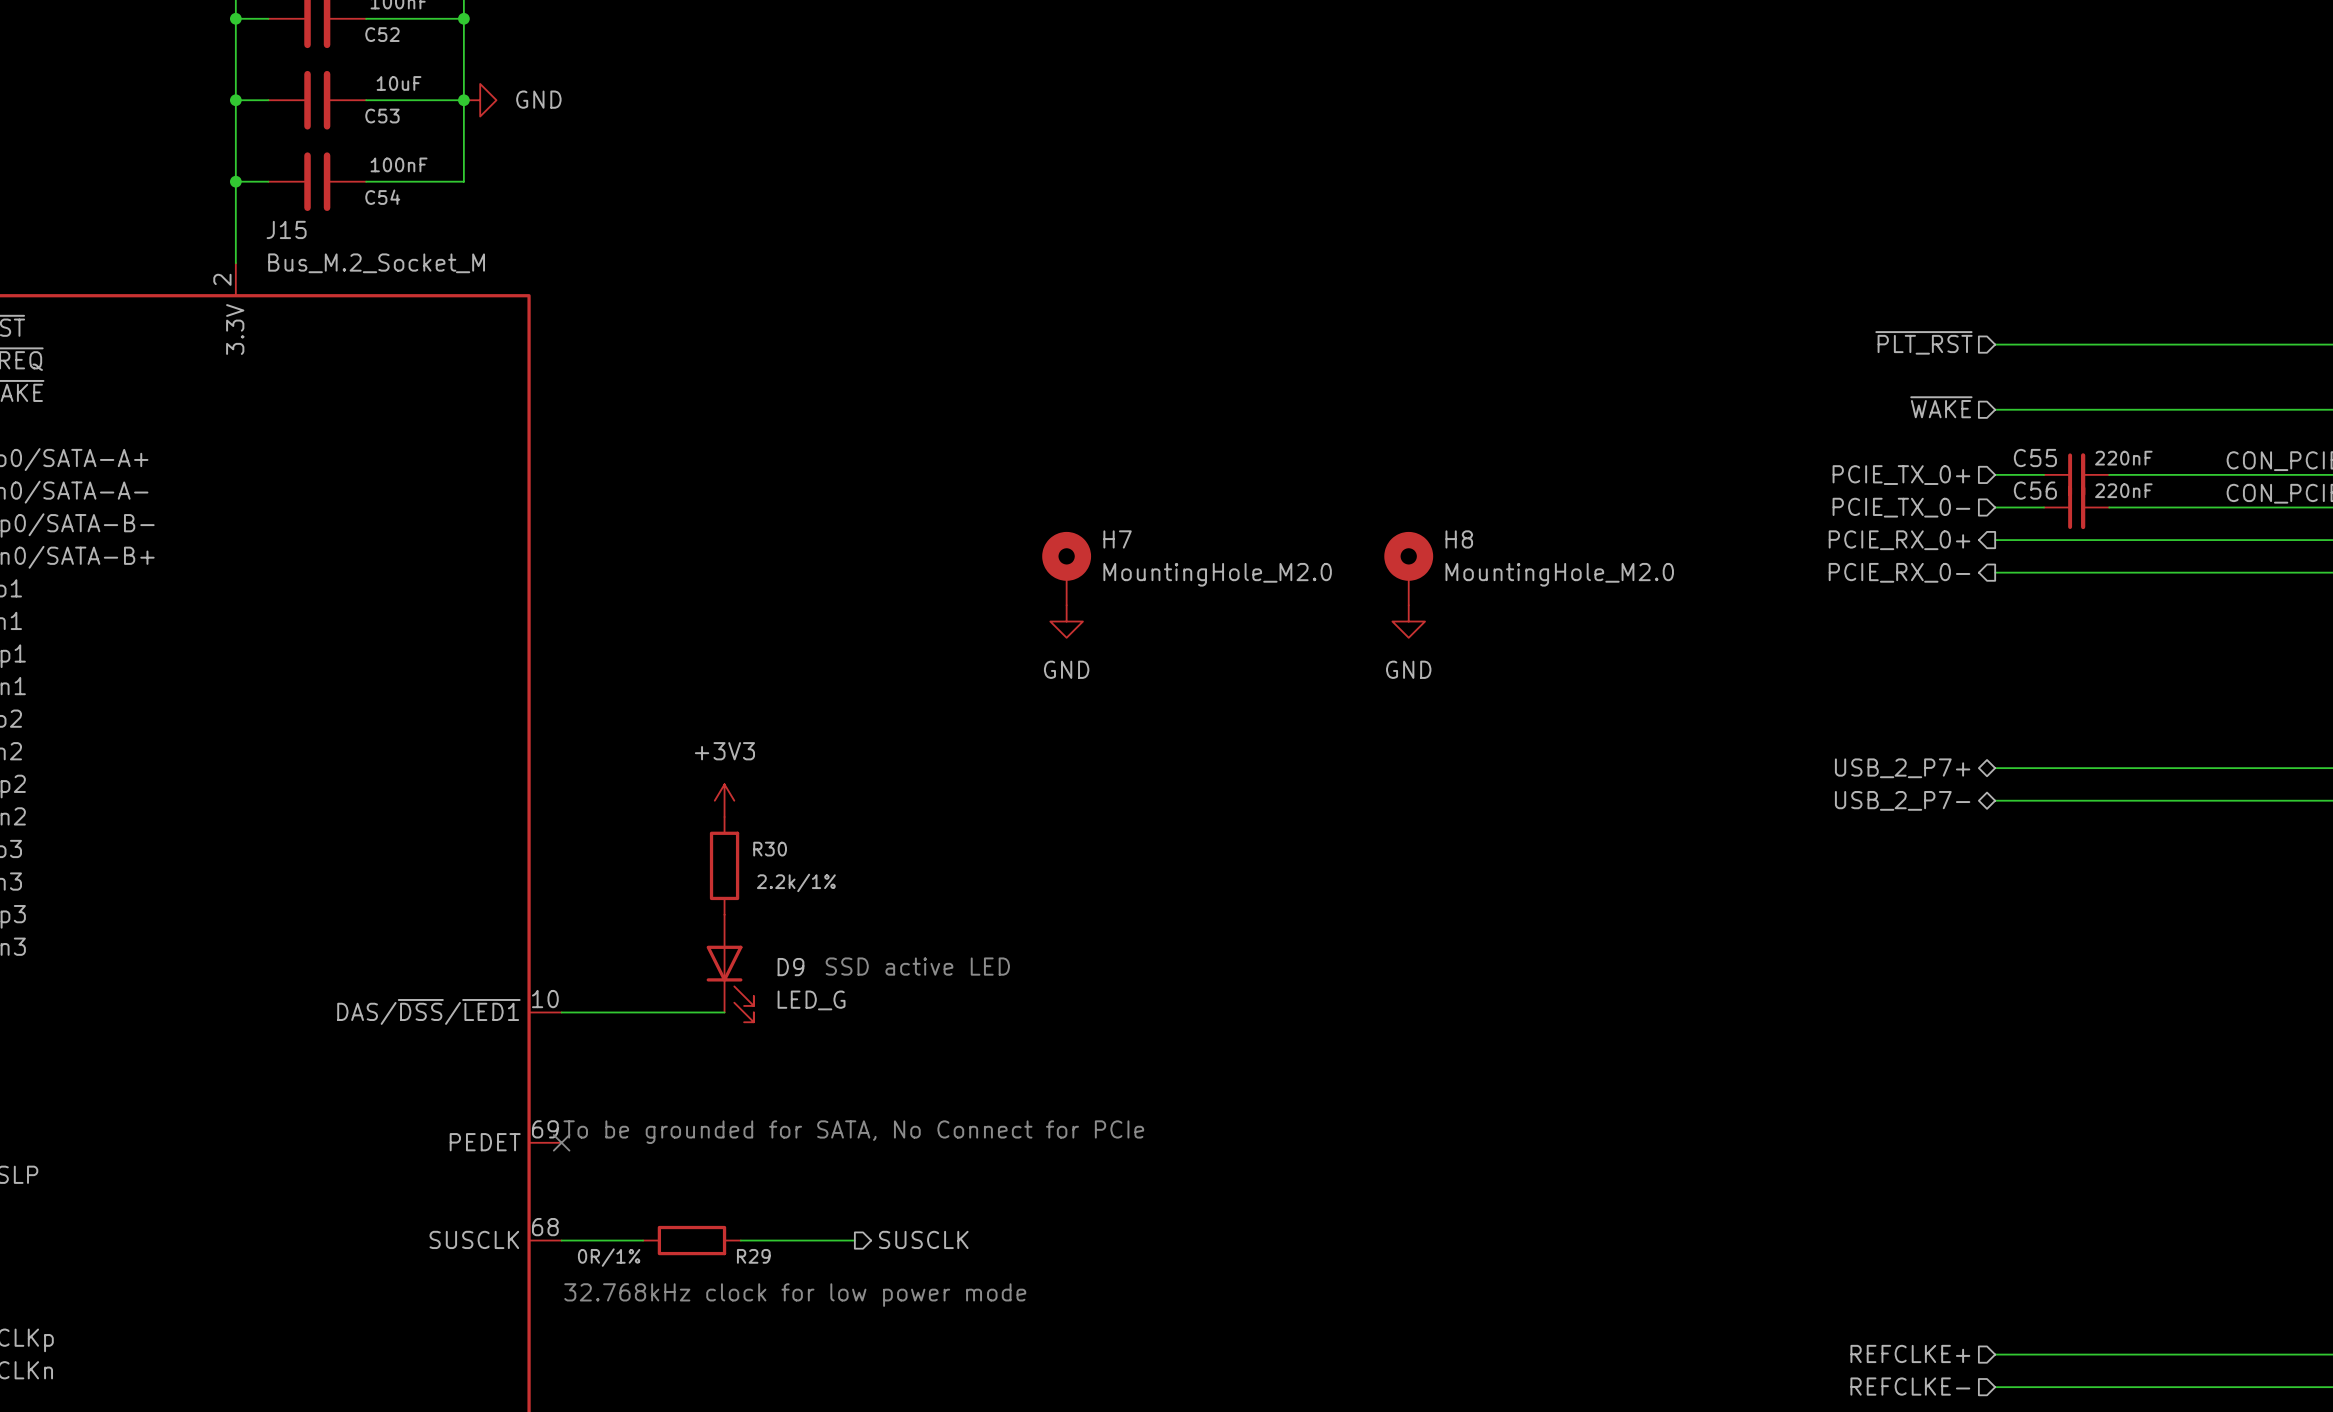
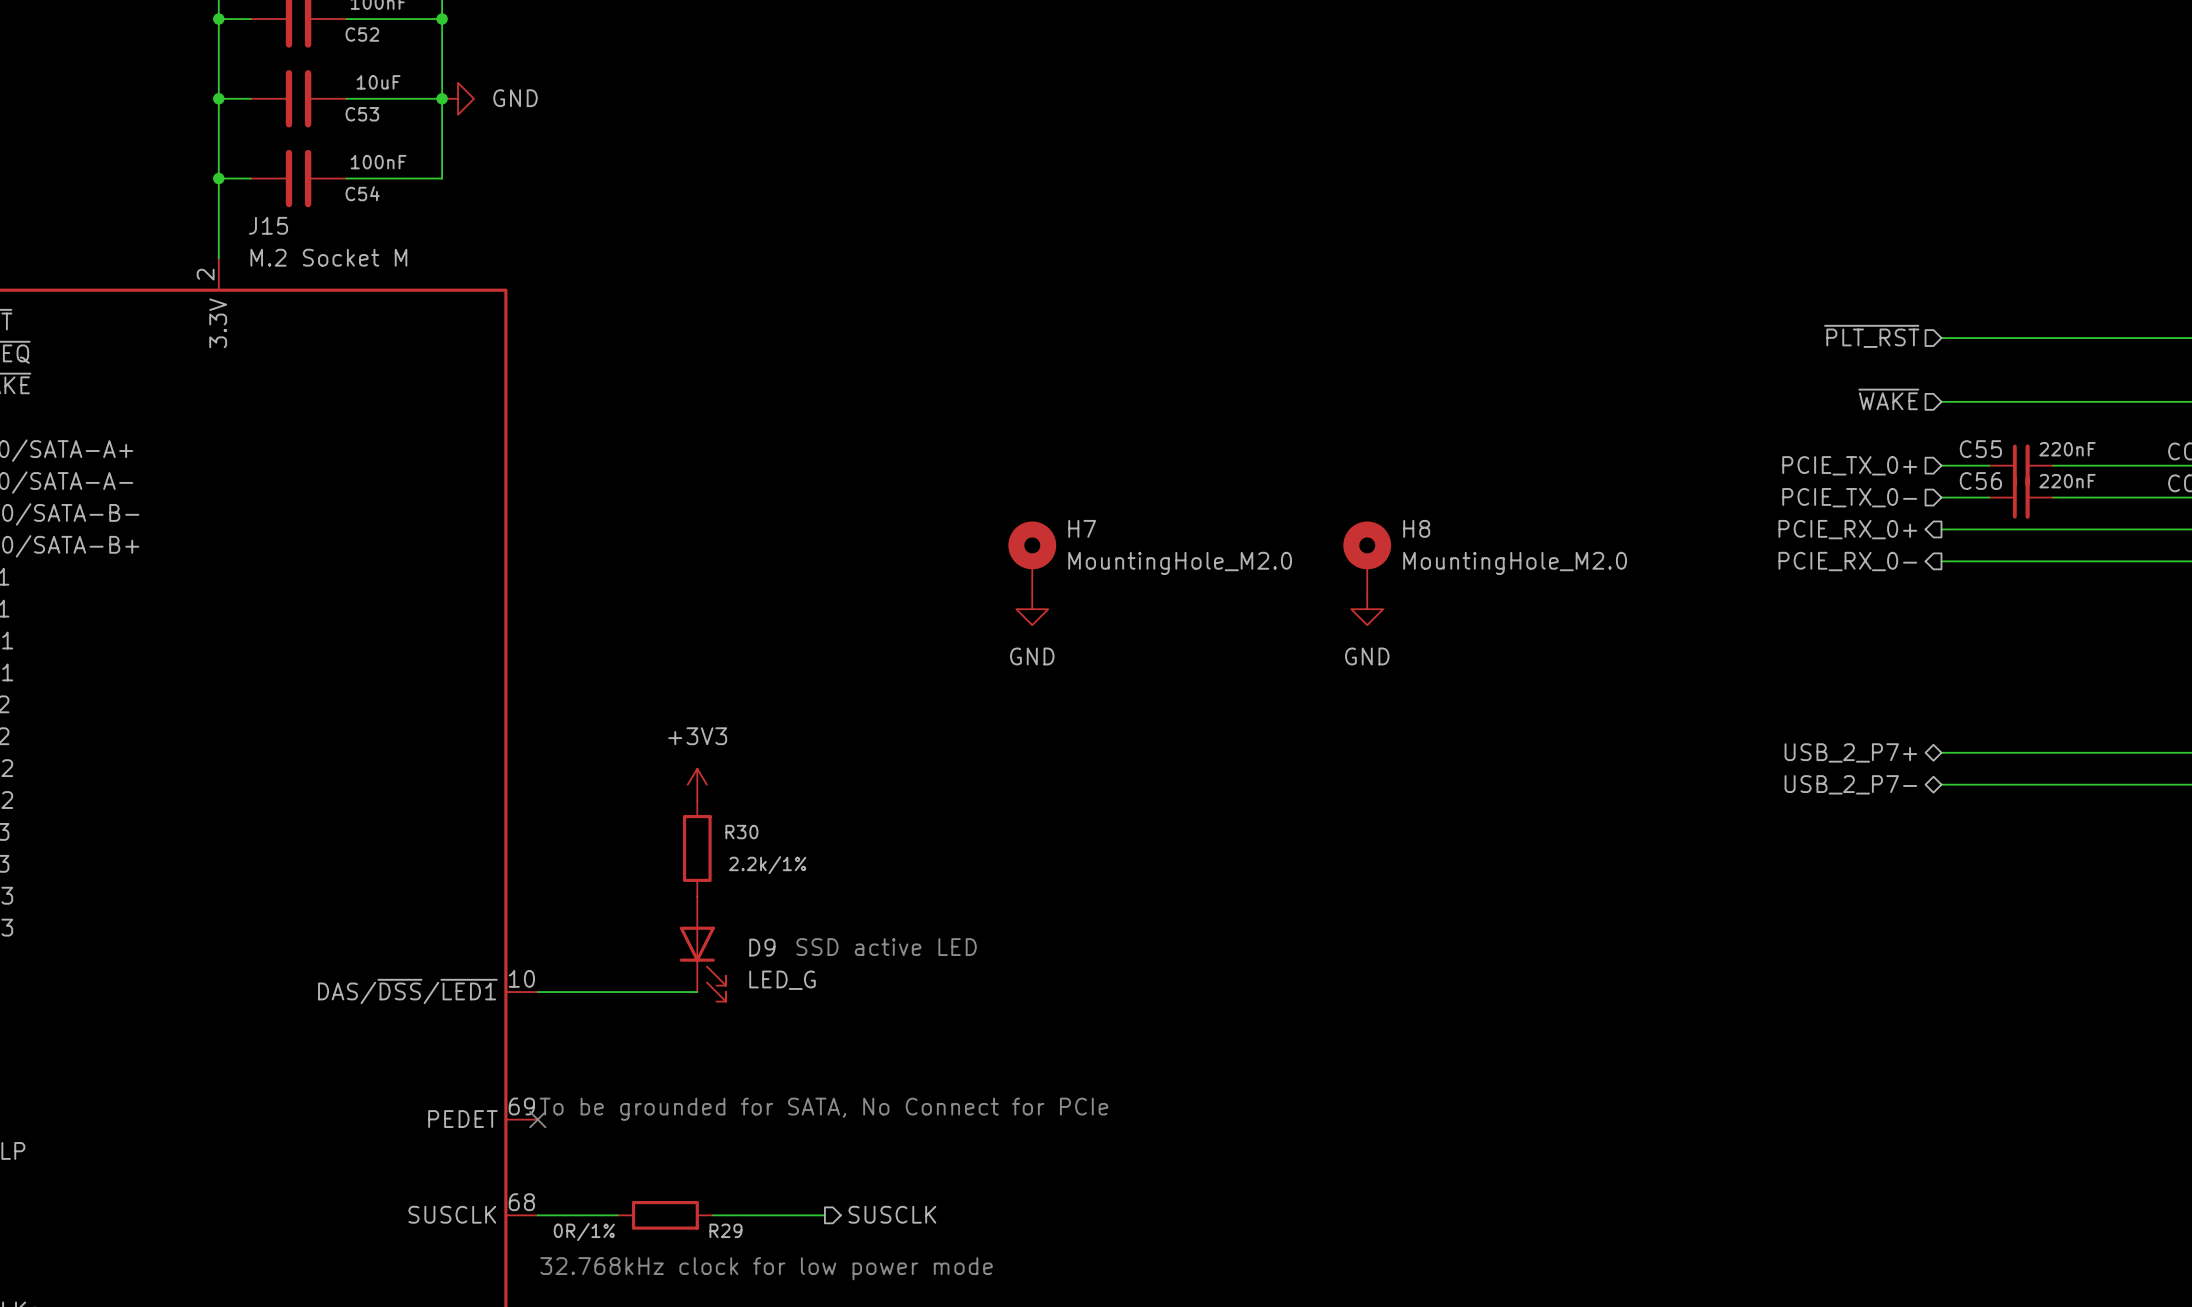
J15 value: Bus_M.2_Socket_M (376, 263) -> M.2 Socket M (328, 257)

